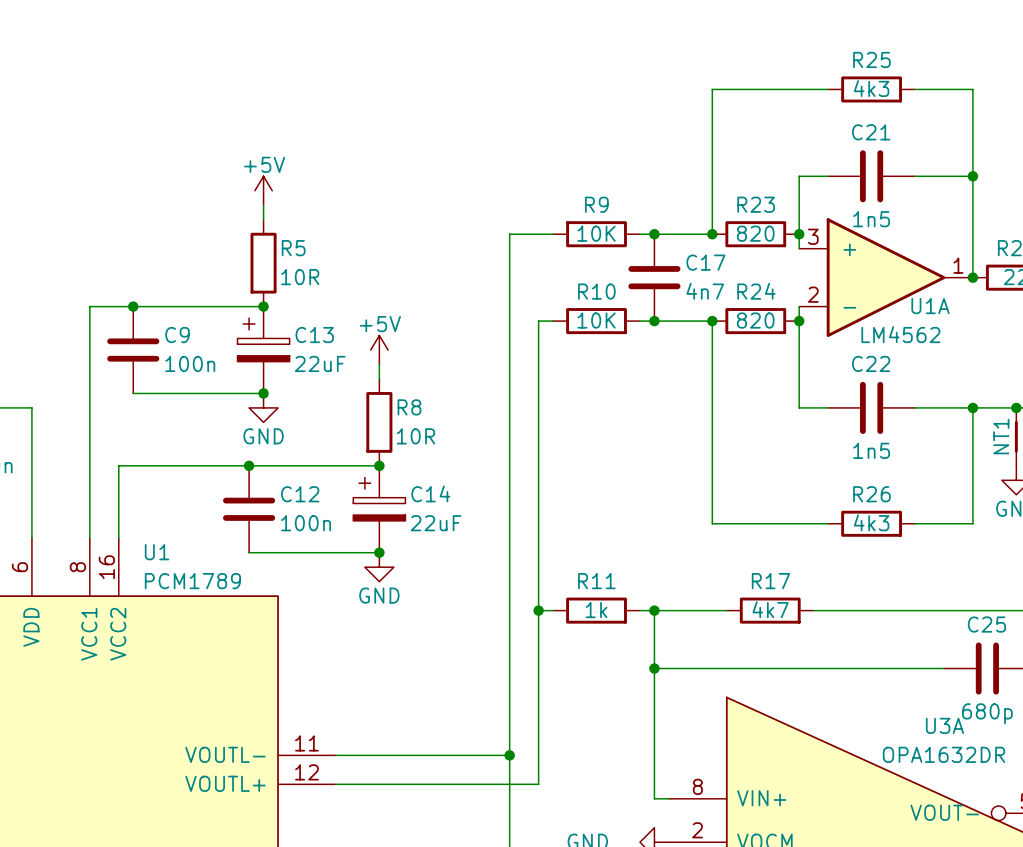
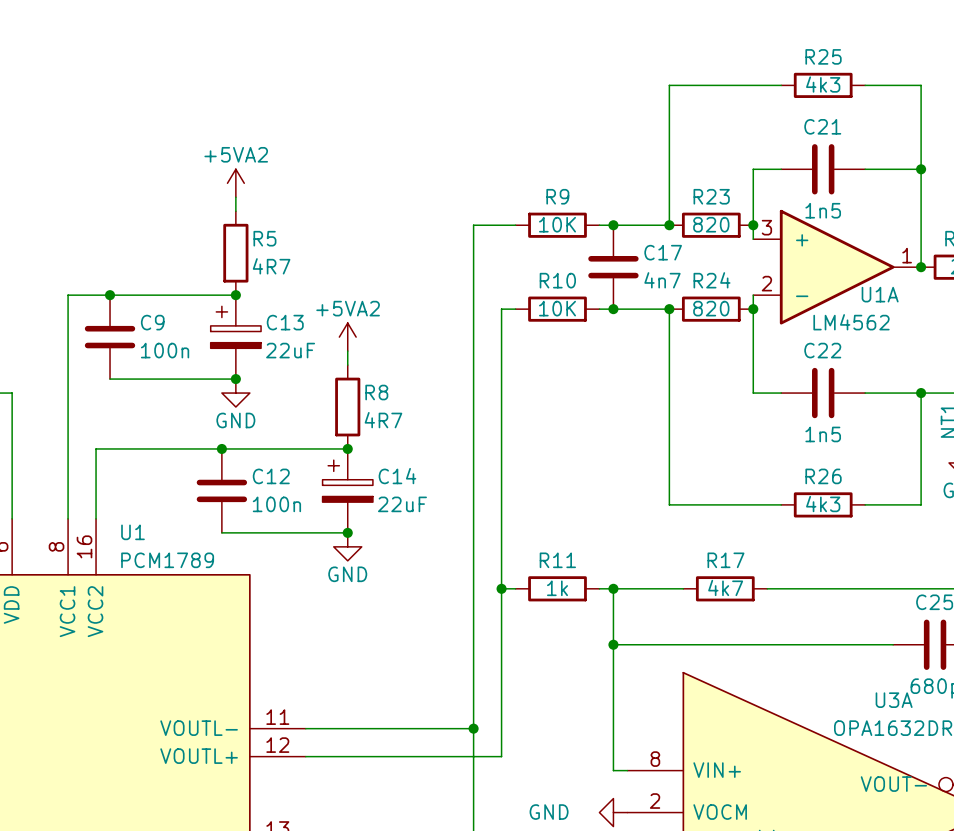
power symbol: +5V (263, 190) -> +5VA2 (235, 183)
R5 value: 10R (300, 277) -> 4R7 (271, 266)
power symbol: +5V (379, 350) -> +5VA2 (347, 337)
R8 value: 10R (416, 436) -> 4R7 (383, 420)

